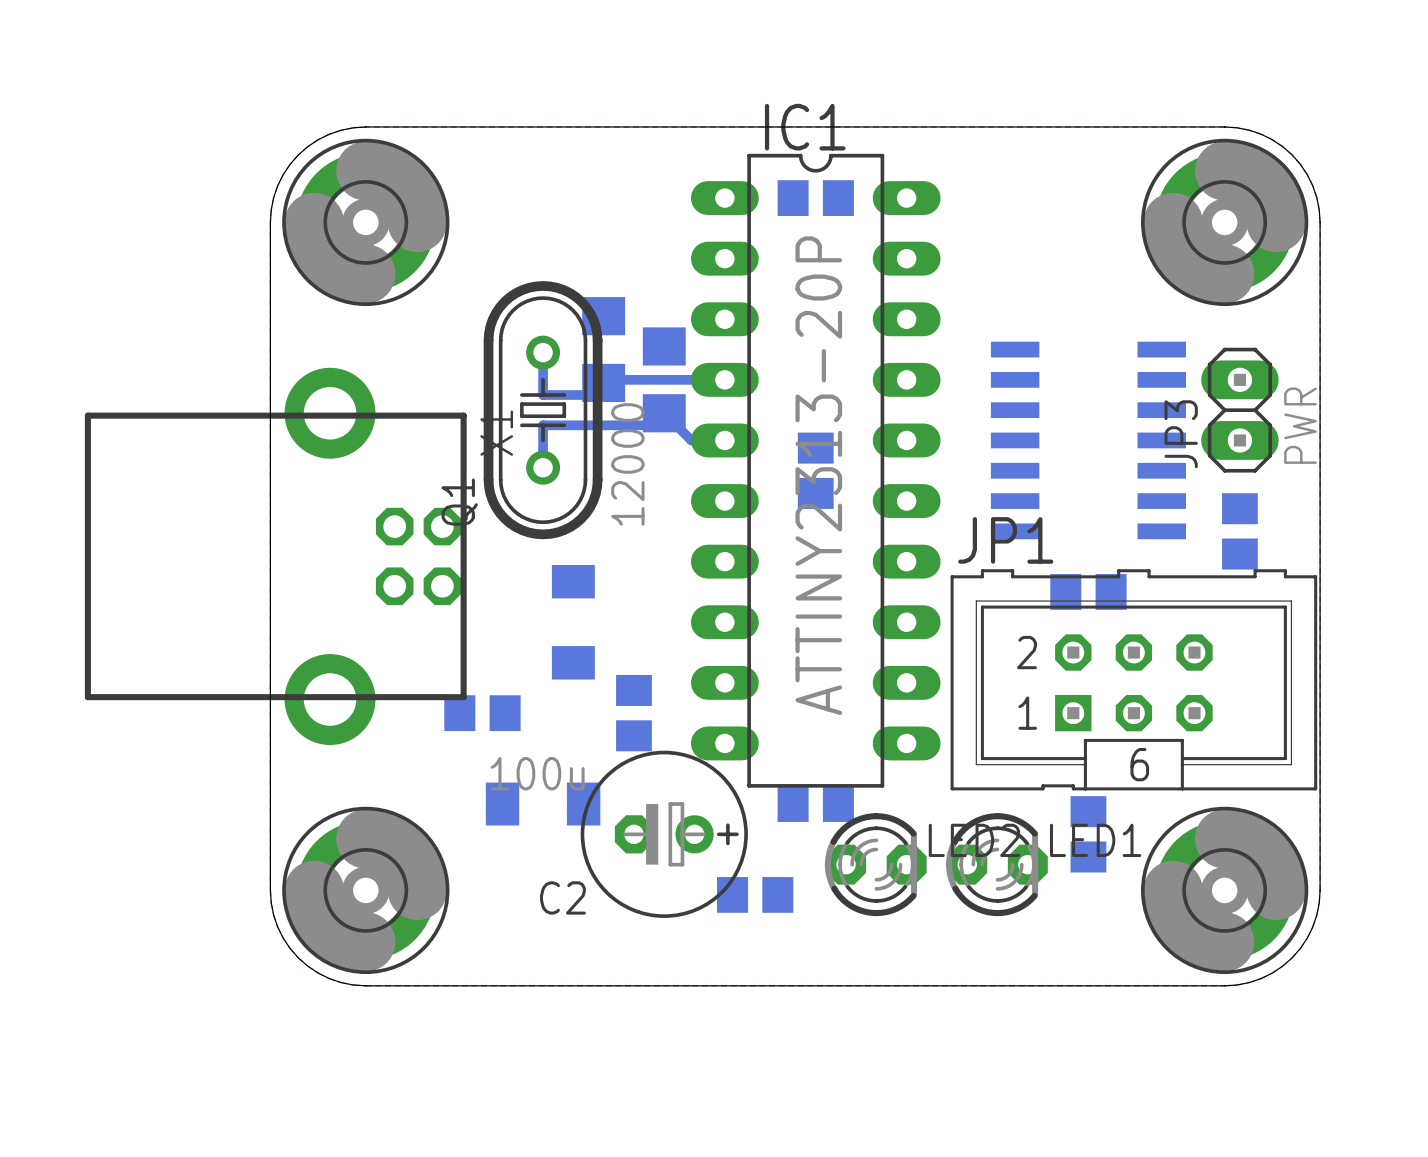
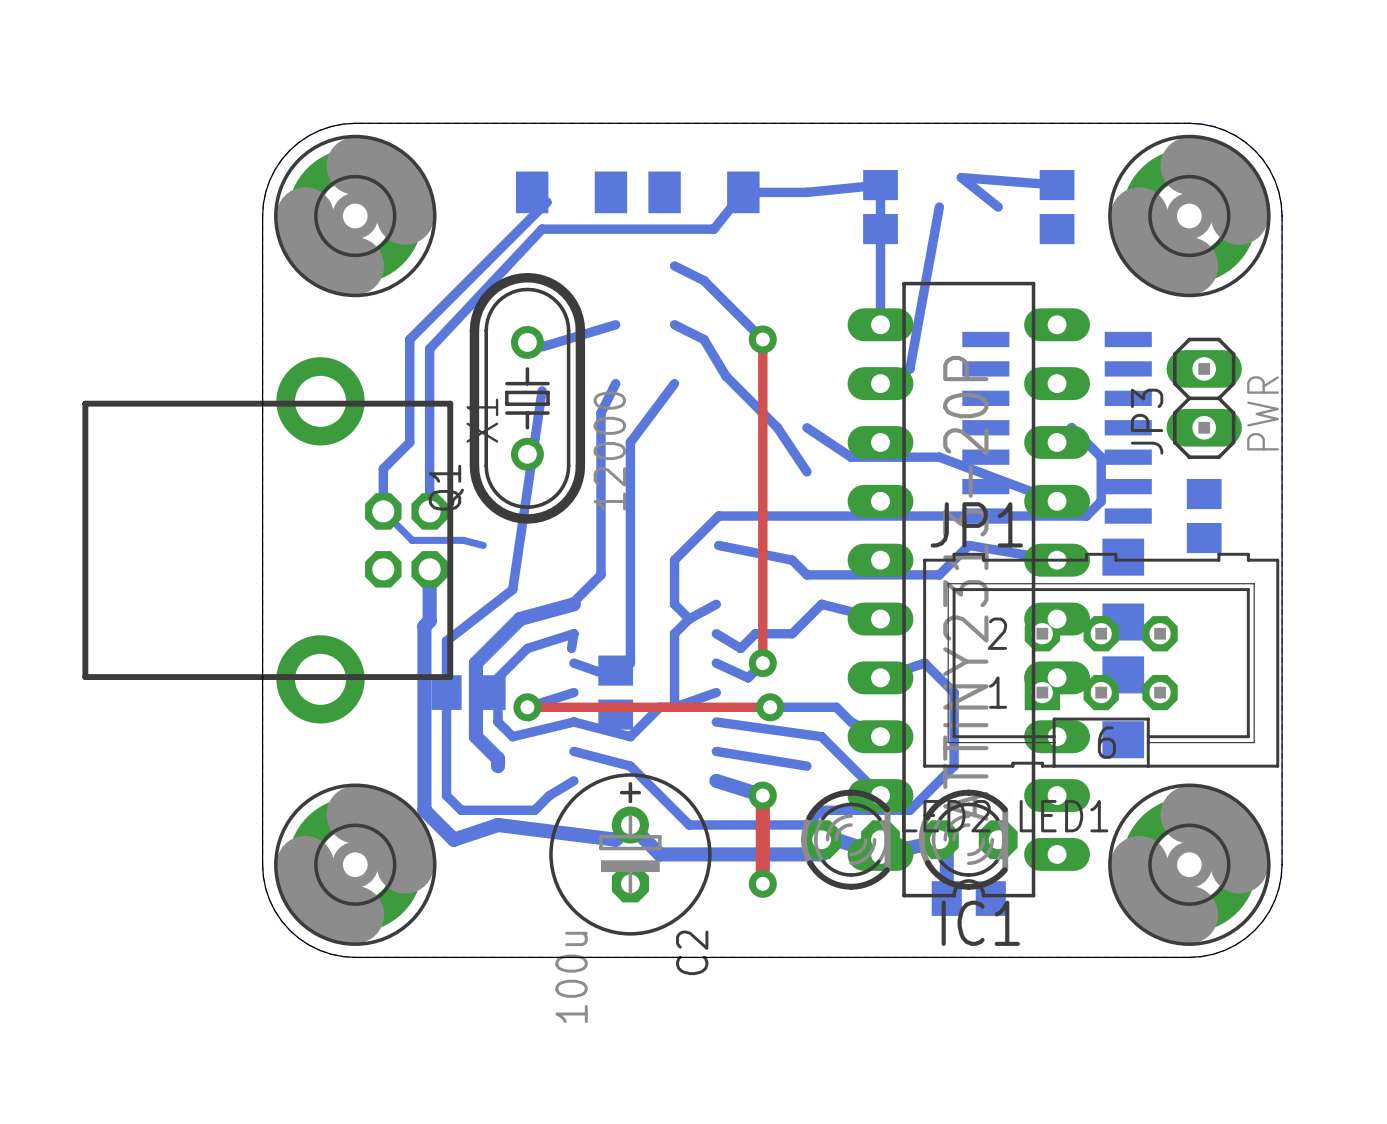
bottom track: none -> (880, 185) (806, 192) (743, 192) (713, 229) (542, 229) (429, 348) (429, 511)
bottom track: none -> (1057, 185) (961, 177) (998, 207)
bottom track: none -> (532, 192) (546, 202) (409, 339) (409, 442) (383, 468) (383, 511) (412, 540) (463, 540) (483, 545)
part: none -> (571, 192)
part: none -> (703, 192)
part rotation: 0° (815, 198) -> 90° clockwise (880, 207)
part position: (815, 198) -> (880, 207)
bottom track: none -> (880, 199) (880, 324)
bottom track: none -> (939, 207) (909, 368) (880, 383)
part: none -> (1057, 207)
bottom track: none -> (674, 265) (703, 280) (762, 339)
bottom track: none -> (615, 324) (542, 346)
bottom track: none -> (674, 324) (703, 339) (726, 376) (777, 427) (806, 471)
part: (603, 349) -> none
top track: none -> (762, 339) (762, 663)
via: none -> (762, 339)
bottom track: (543, 352) (543, 395) (591, 395) (603, 382) (603, 379) (724, 379) -> none
part: (664, 379) -> none
bottom track: none -> (615, 383) (600, 413) (600, 574) (573, 601) (573, 604) (520, 619) (475, 663) (475, 736) (497, 758) (497, 766)
bottom track: none -> (674, 383) (630, 442) (630, 663) (615, 677) (573, 663)
bottom track: none -> (542, 390) (512, 589) (446, 641) (446, 795) (461, 810) (534, 810) (549, 795) (573, 780)
bottom track: (724, 440) (691, 440) (664, 413) (652, 425) (543, 425) (543, 467) -> none
bottom track: none -> (806, 427) (851, 457) (939, 457) (1057, 501)
bottom track: none -> (1057, 442) (1071, 427) (1101, 457) (1101, 501) (1086, 516) (718, 516) (674, 560) (674, 604) (689, 619)
IC1 rotation: 0° (815, 470) -> 180° (968, 589)
part: (815, 470) -> none
bottom track: none -> (718, 545) (792, 560) (806, 574) (939, 574) (968, 545) (1057, 560)
bottom track: none -> (429, 569) (429, 621) (424, 626) (424, 810) (453, 839) (497, 824) (615, 839) (630, 824) (659, 854) (821, 854) (836, 839) (880, 854) (946, 839) (946, 898)
part: (1088, 591) -> none
part: none -> (1123, 589)
part: (573, 622) -> none
bottom track: none -> (716, 604) (689, 619)
bottom track: none -> (689, 619) (674, 633) (674, 707)
bottom track: none -> (880, 619) (821, 604) (792, 633) (755, 633) (740, 648) (716, 633)
bottom track: none -> (571, 648) (573, 633) (527, 648) (497, 677) (497, 722) (512, 736) (573, 722) (630, 736) (659, 707) (674, 707)
bottom track: none -> (716, 663) (748, 677) (762, 663)
via: none -> (762, 663)
bottom track: none -> (880, 677) (924, 663) (954, 692) (954, 766) (909, 810) (821, 810) (806, 824) (689, 824) (630, 766) (573, 751)
bottom track: none -> (573, 692) (527, 707)
bottom track: none -> (716, 692) (674, 707)
top track: none -> (527, 707) (770, 707)
via: none -> (527, 707)
bottom track: none -> (770, 707) (836, 707) (851, 722) (880, 736)
via: none -> (770, 707)
part: none -> (1123, 707)
bottom track: none -> (716, 722) (821, 736) (880, 795)
bottom track: none -> (716, 751) (806, 766)
part: (543, 804) -> none
bottom track: none -> (716, 780) (762, 795)
part: (815, 804) -> none
top track: none -> (762, 795) (762, 883)
via: none -> (762, 795)
C2 rotation: 0° (664, 834) -> 90° counterclockwise (630, 854)
part: (1088, 834) -> none
part: (755, 894) -> none
via: none -> (762, 883)
part: none -> (968, 898)

